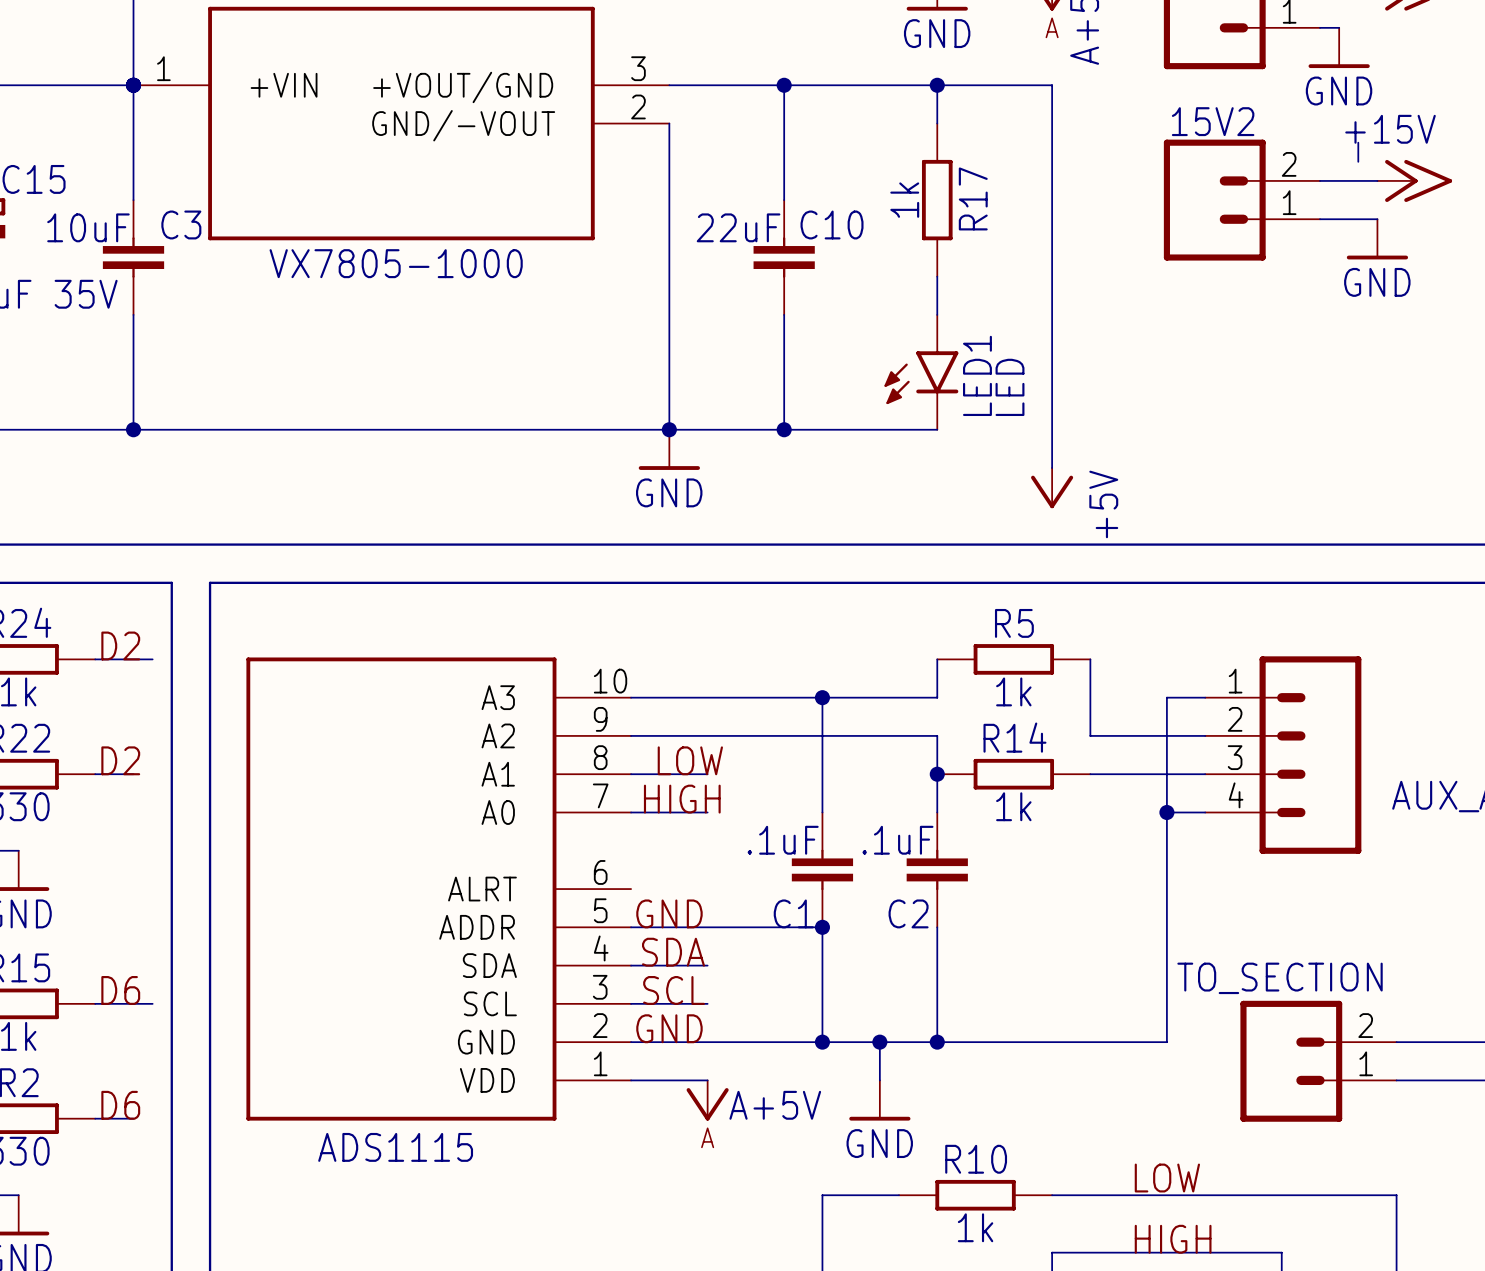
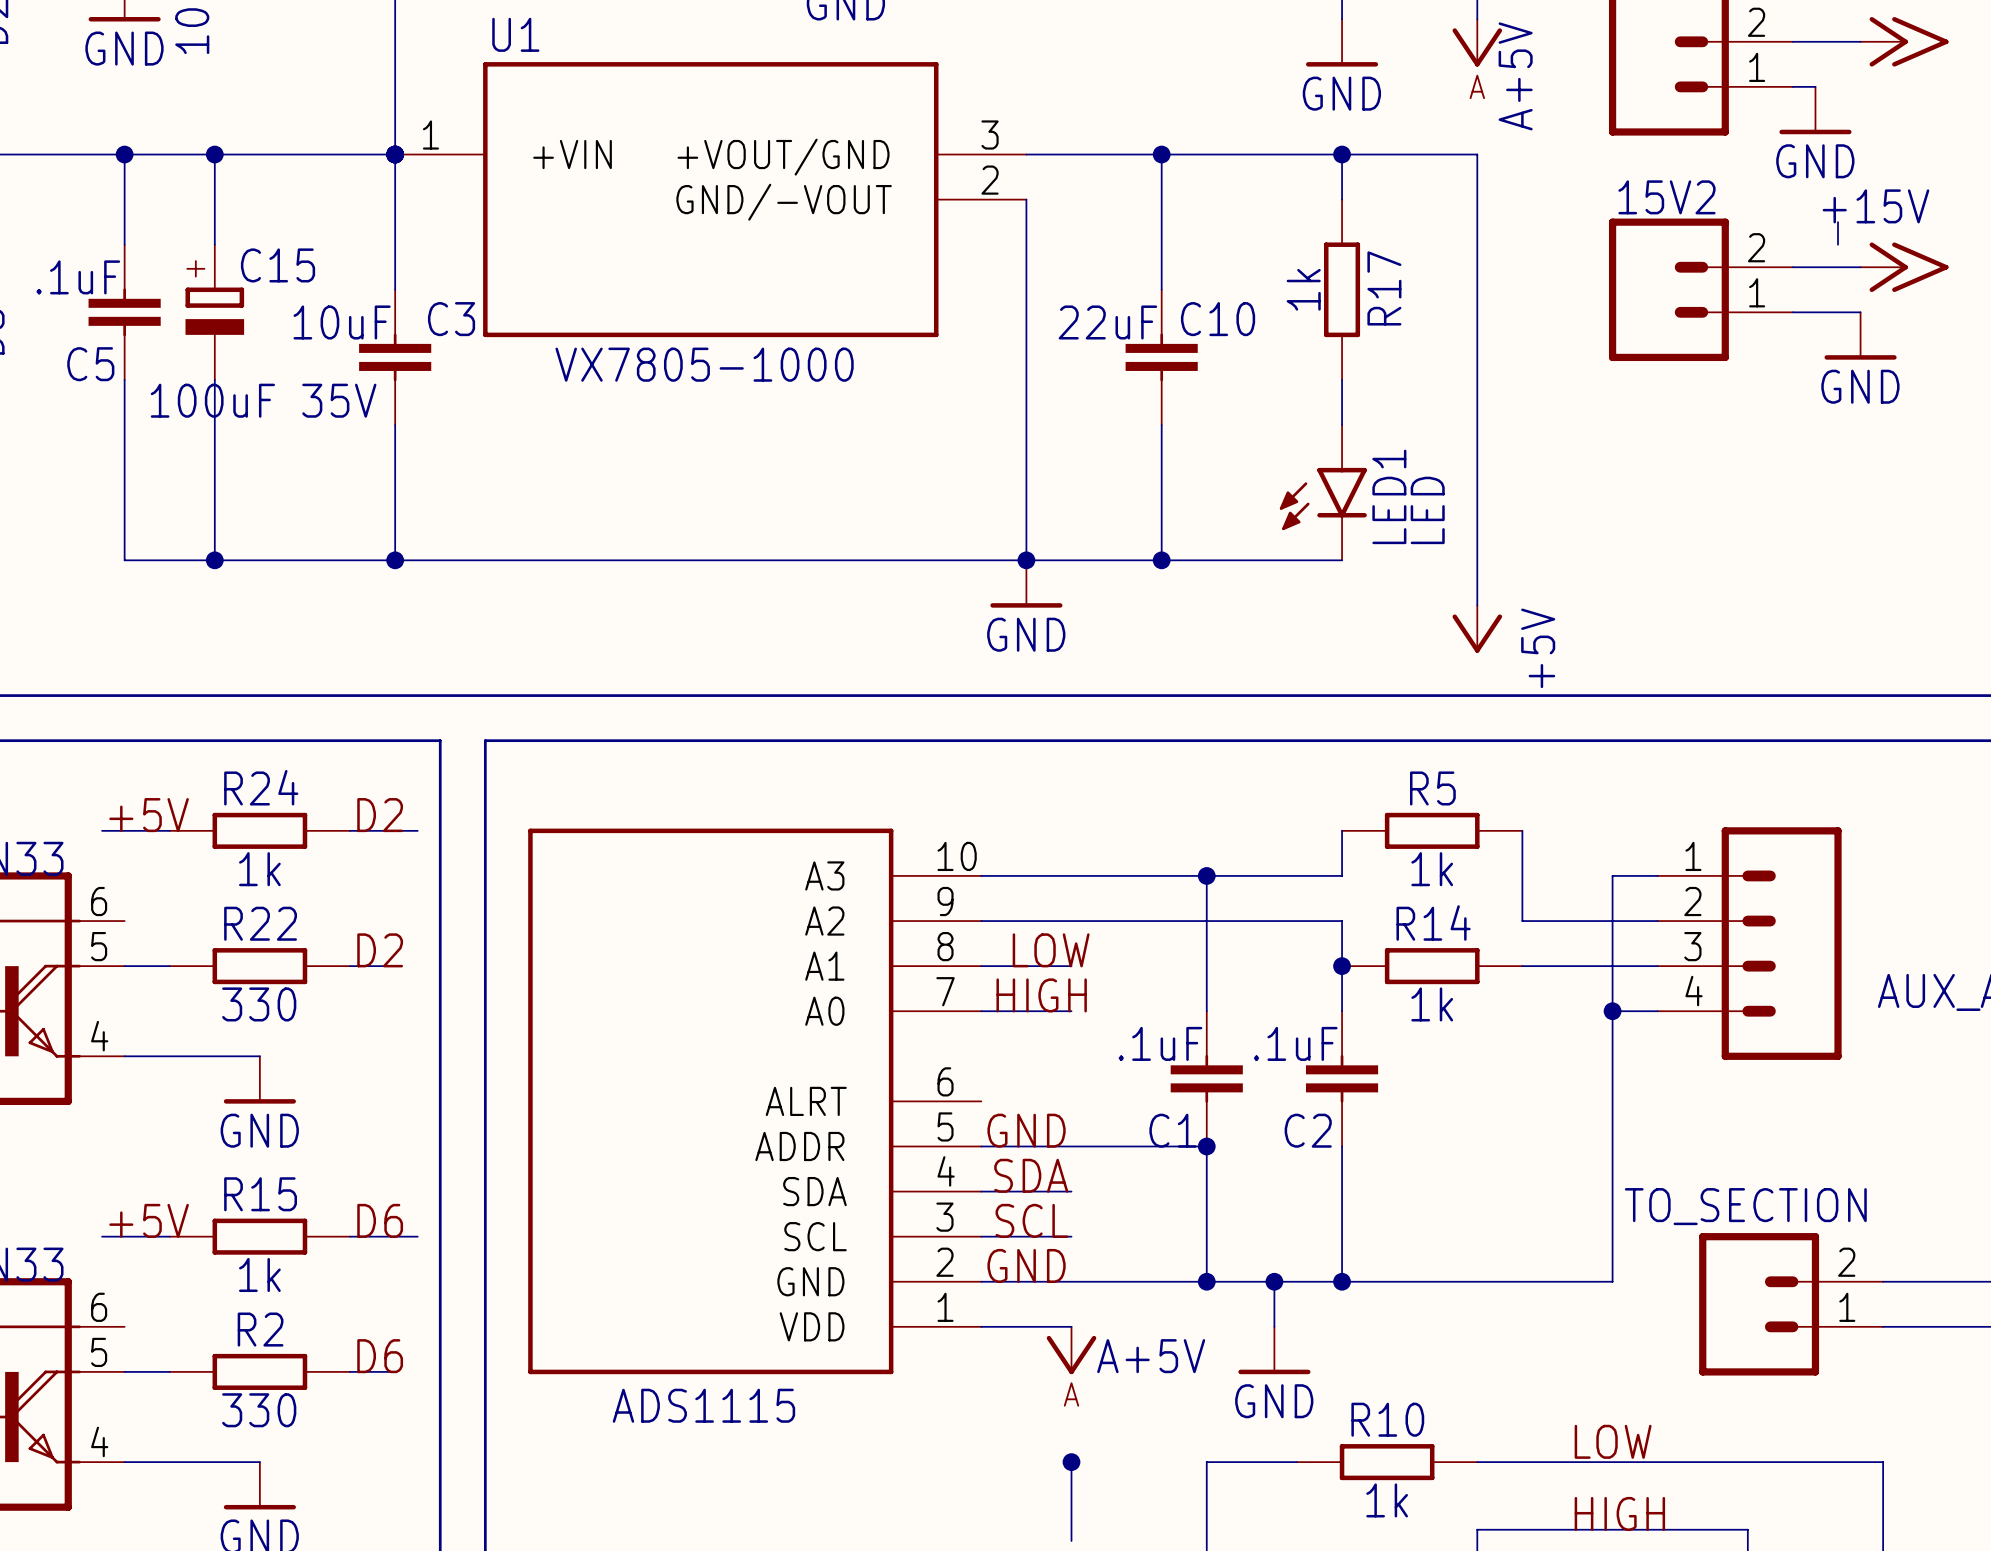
wire: none -> (1071, 1462) (1071, 1541)
junction: none -> (1071, 1462)

